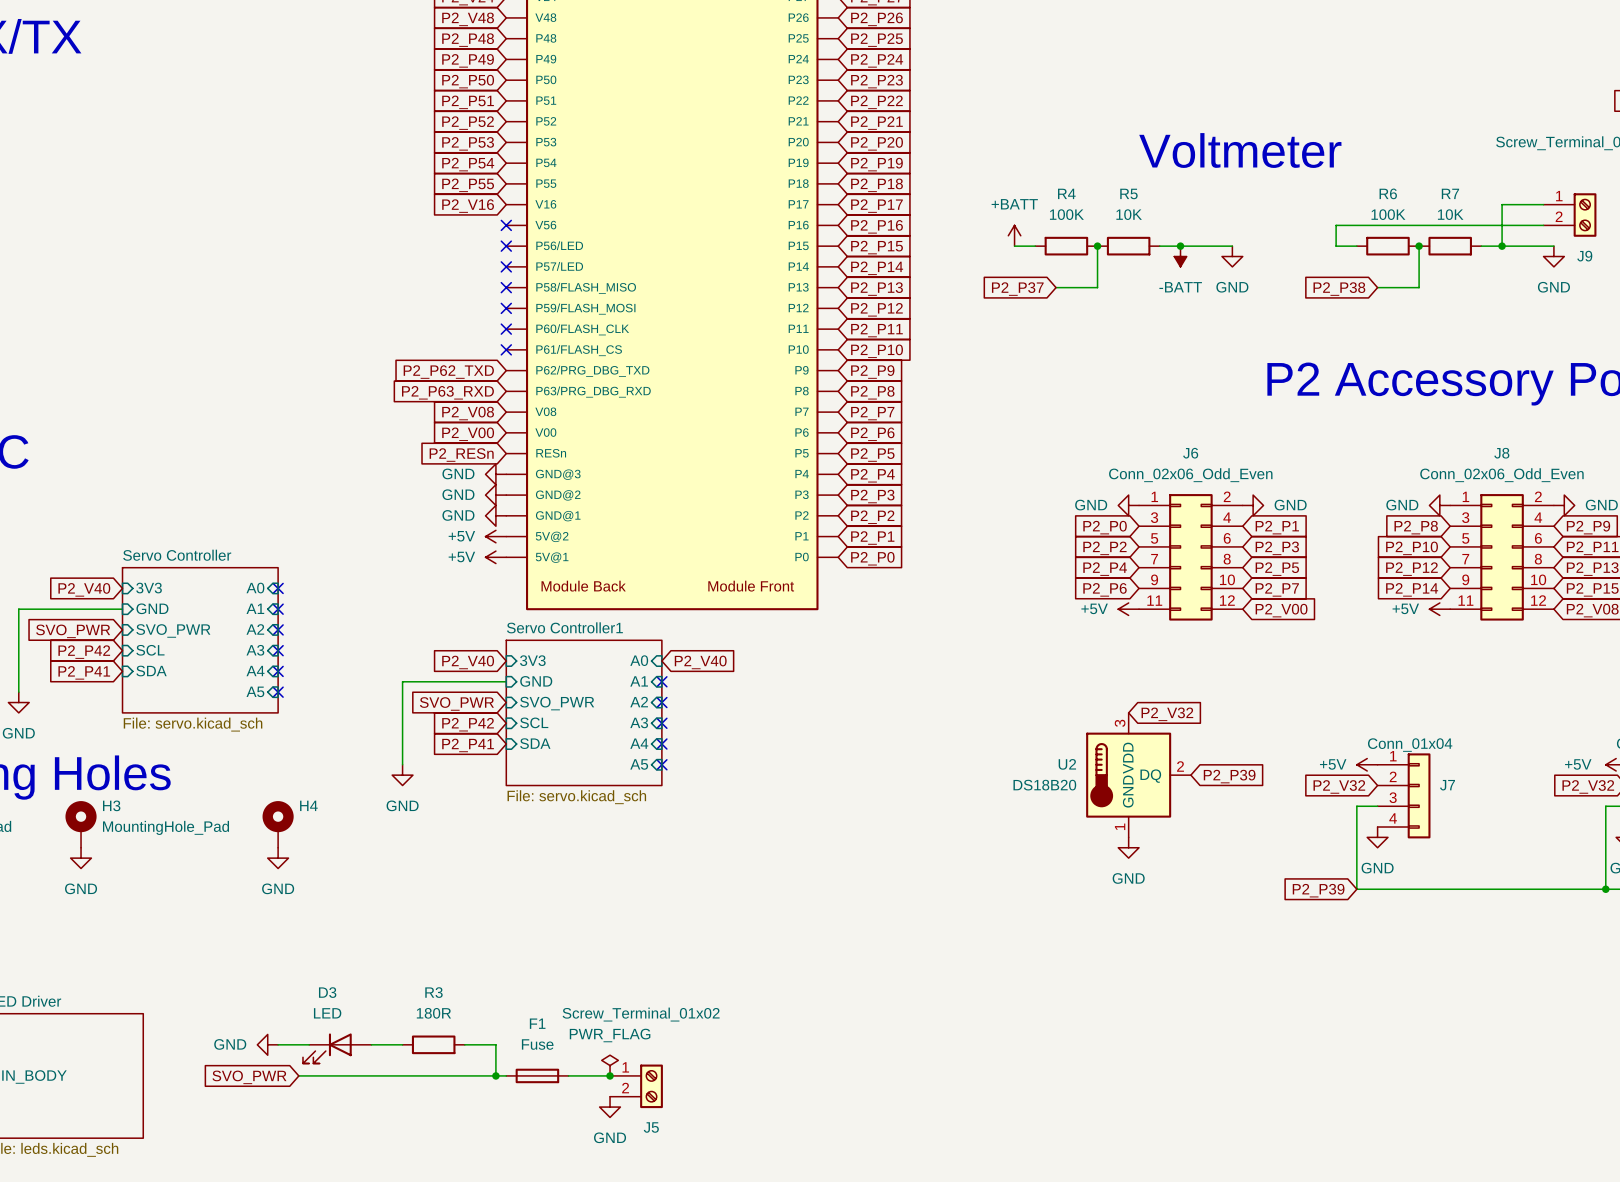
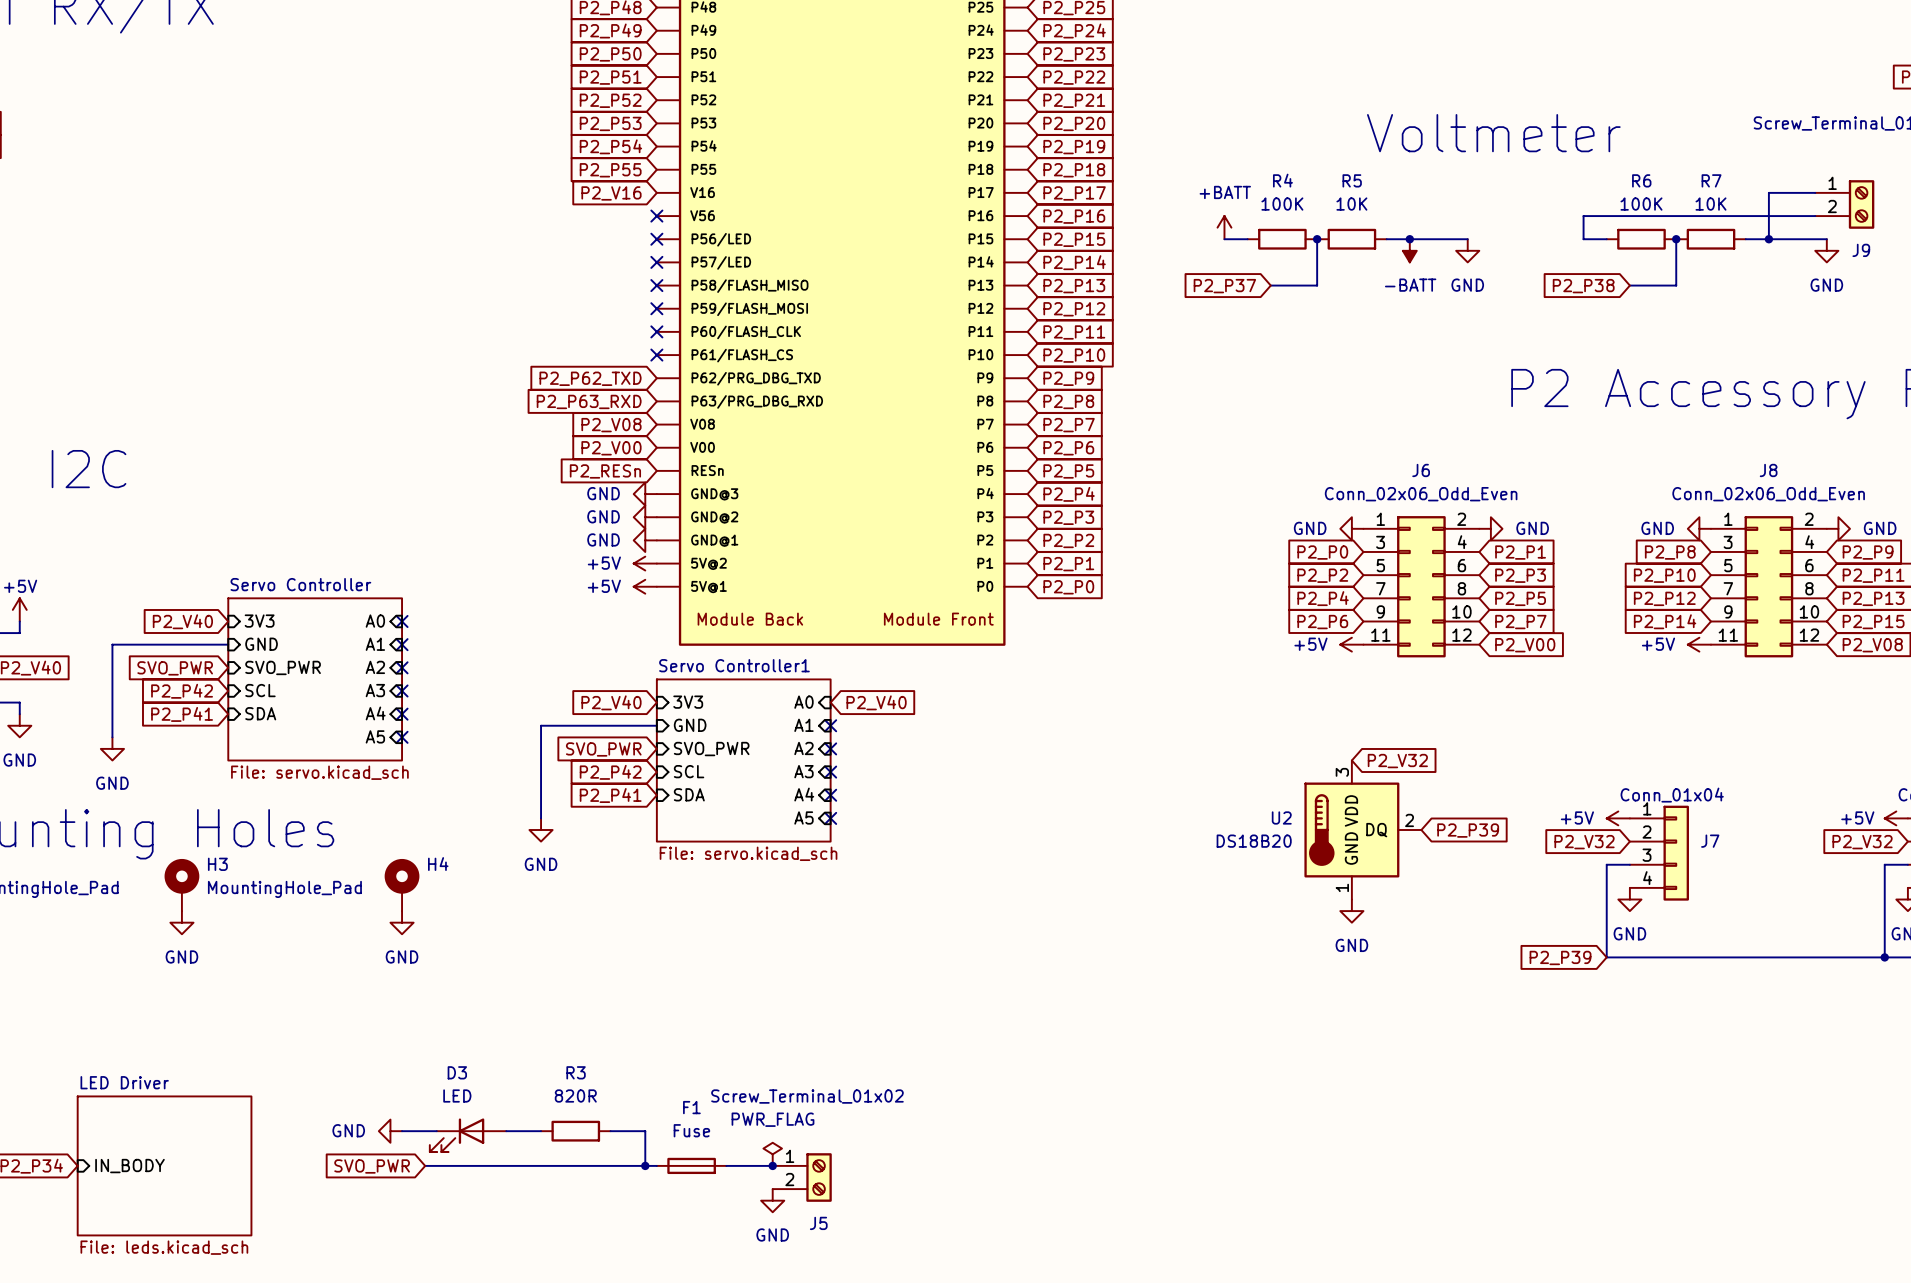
R3 value: 180R (433, 1013) -> 820R (575, 1095)

